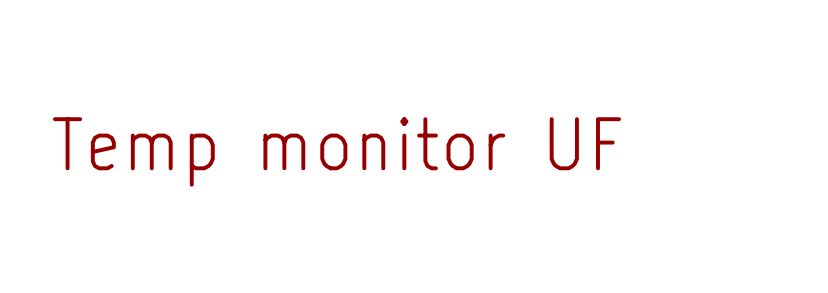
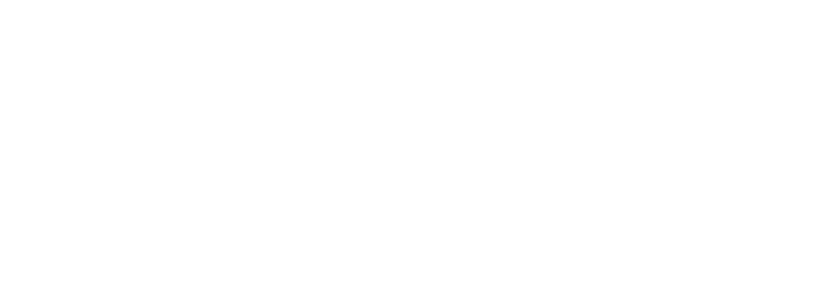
text: Temp monitor UF (336, 151) -> none

